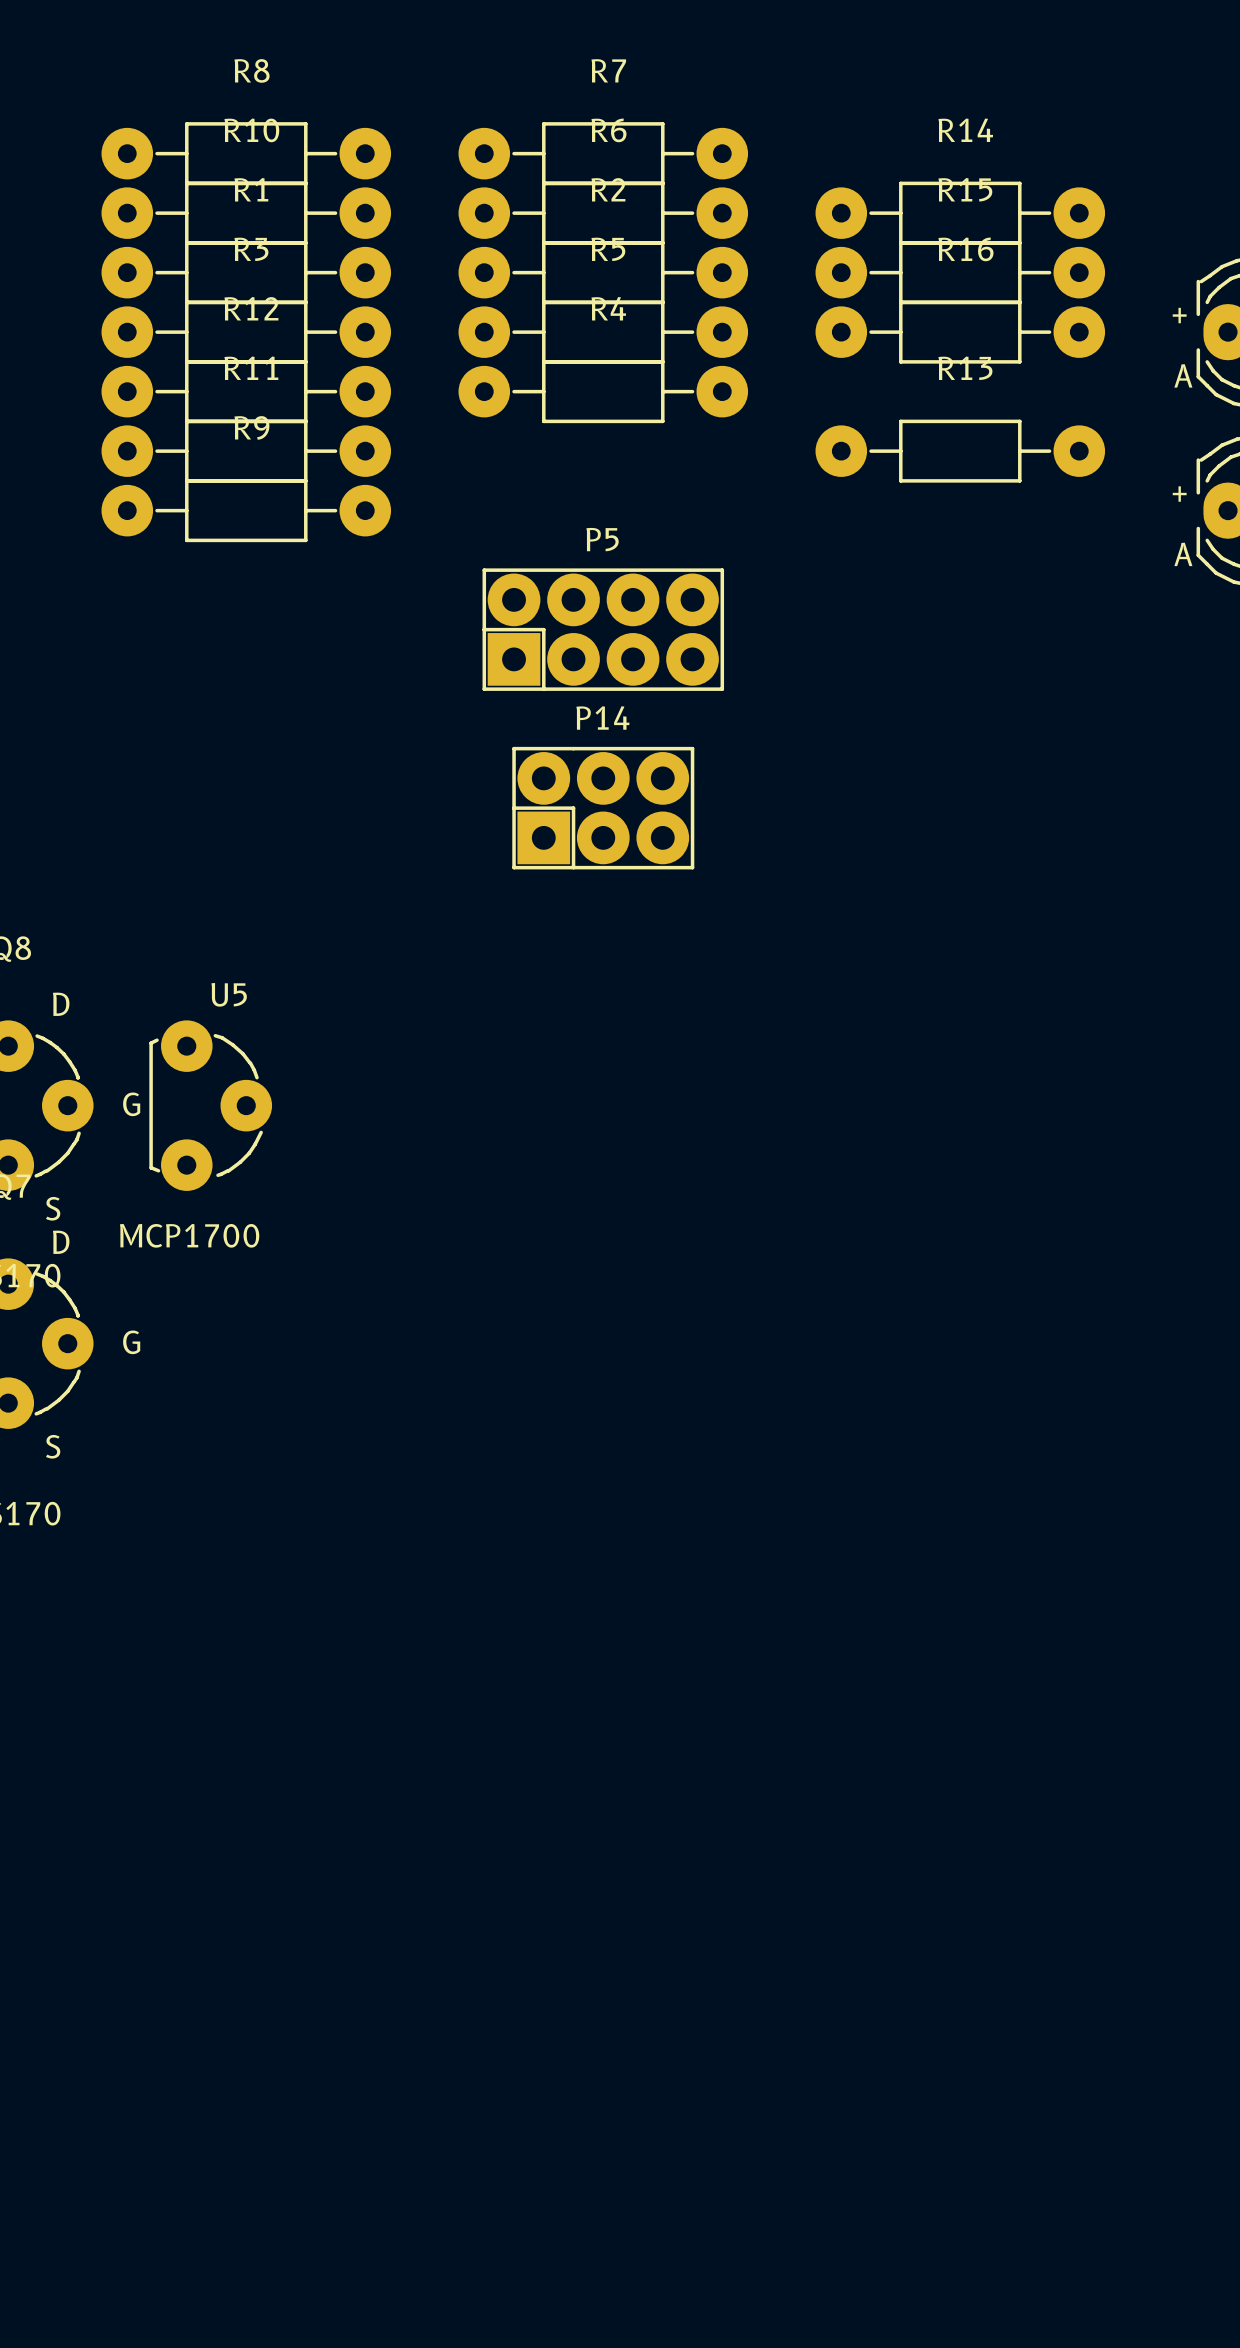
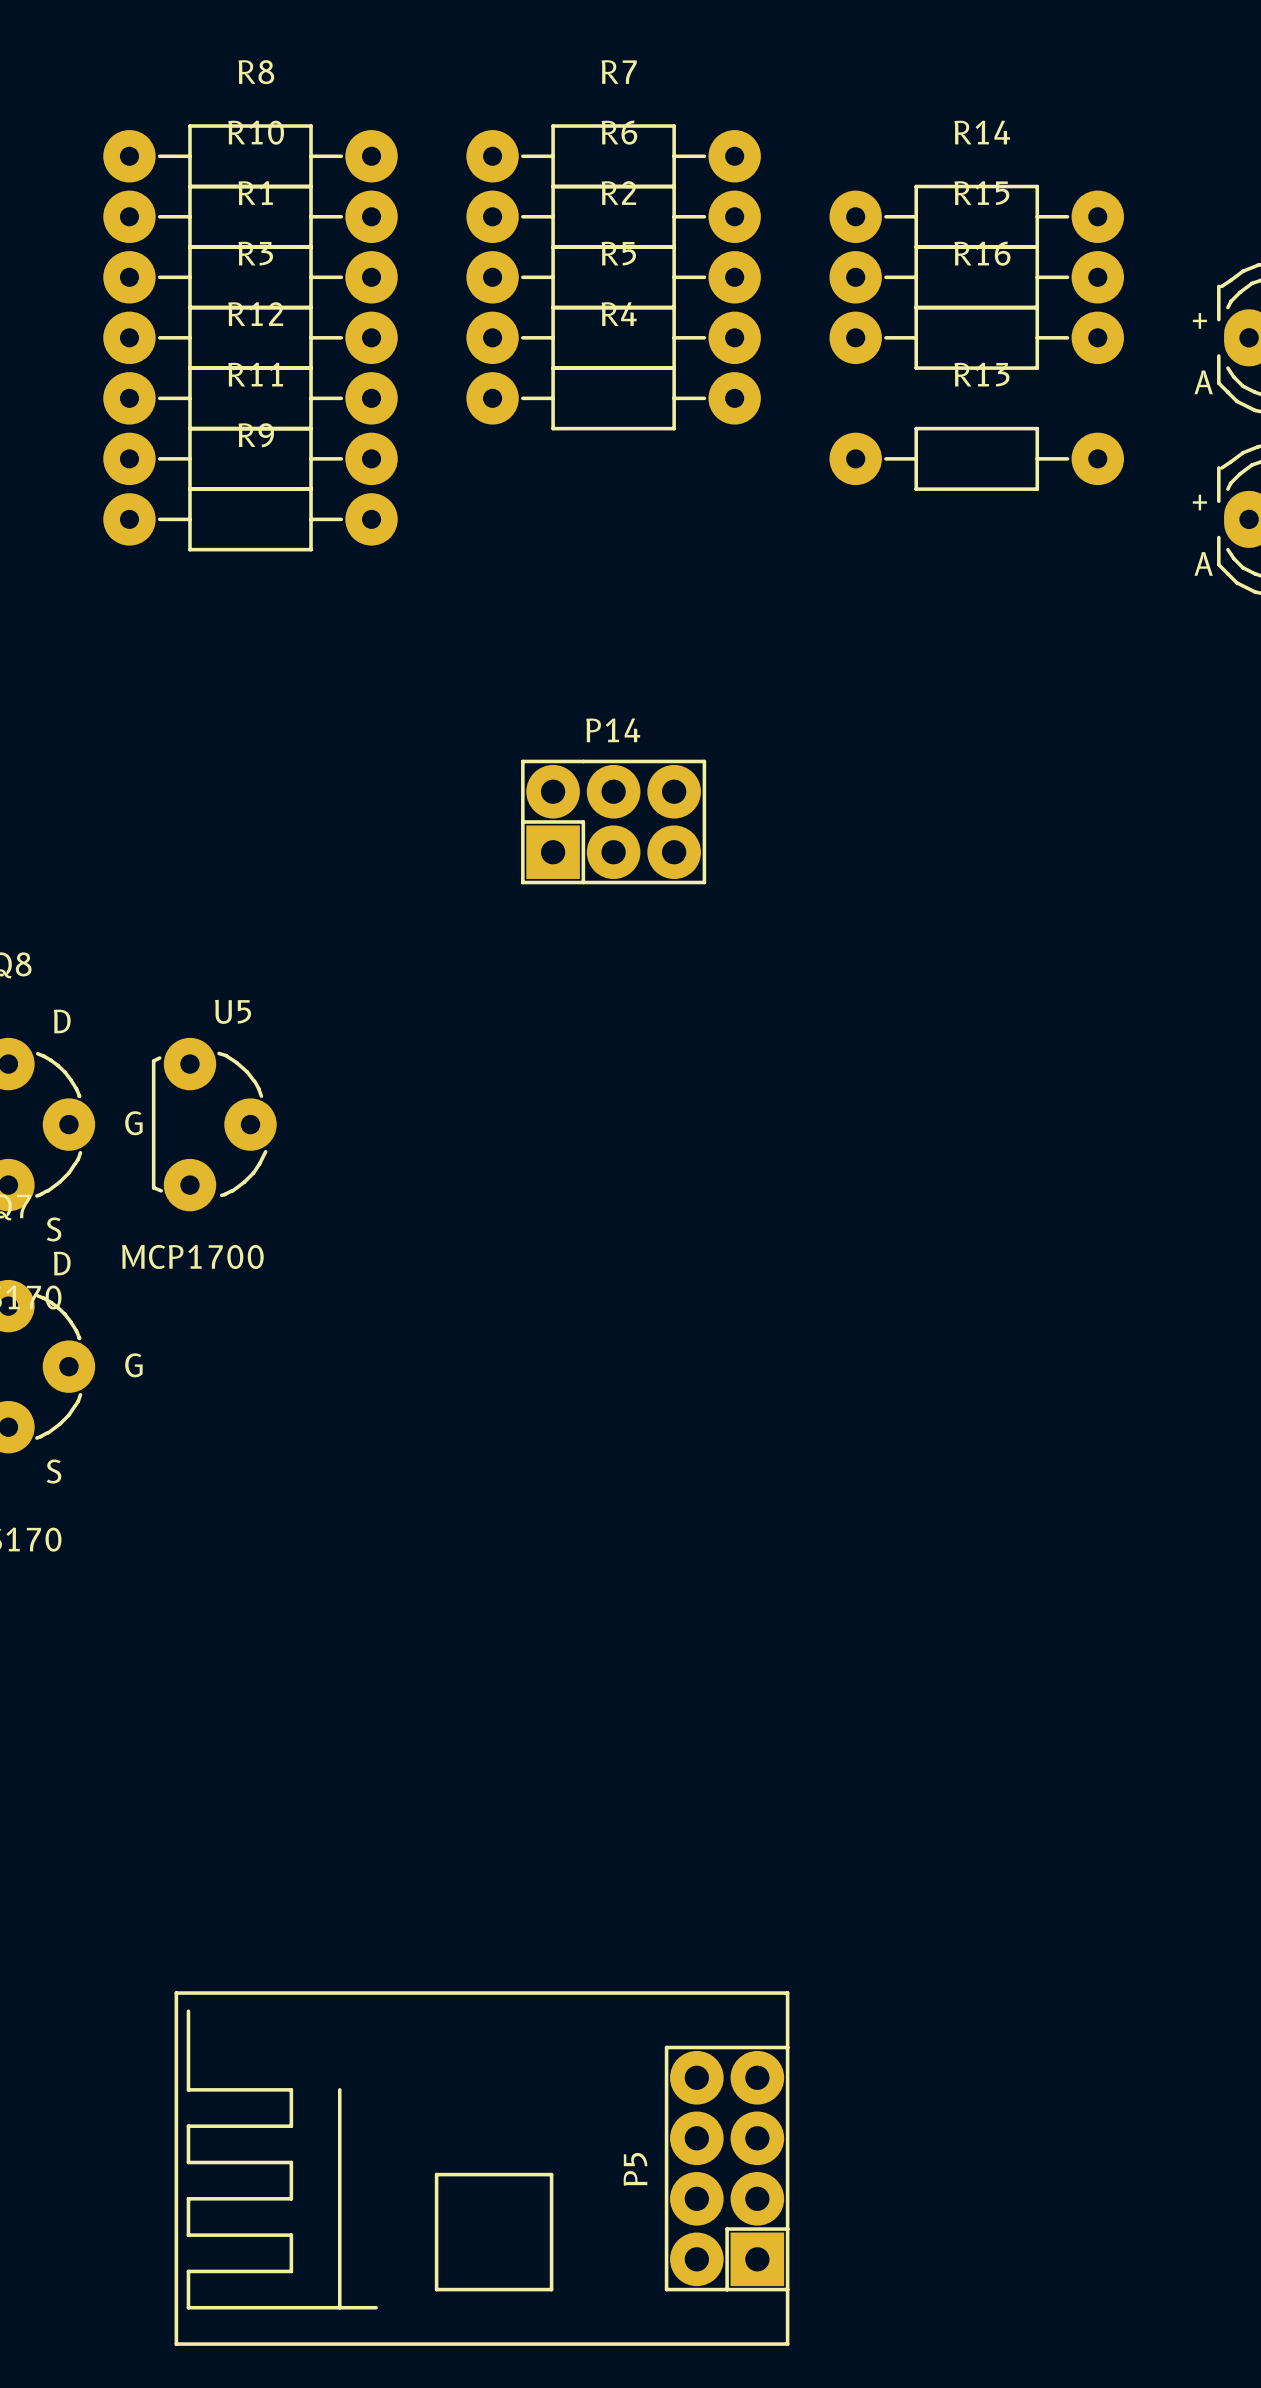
P5 name position: P5 (602, 539) -> P5 (635, 2169)
P5 footprint: [482, 568, 725, 691] -> [174, 1991, 790, 2346]

